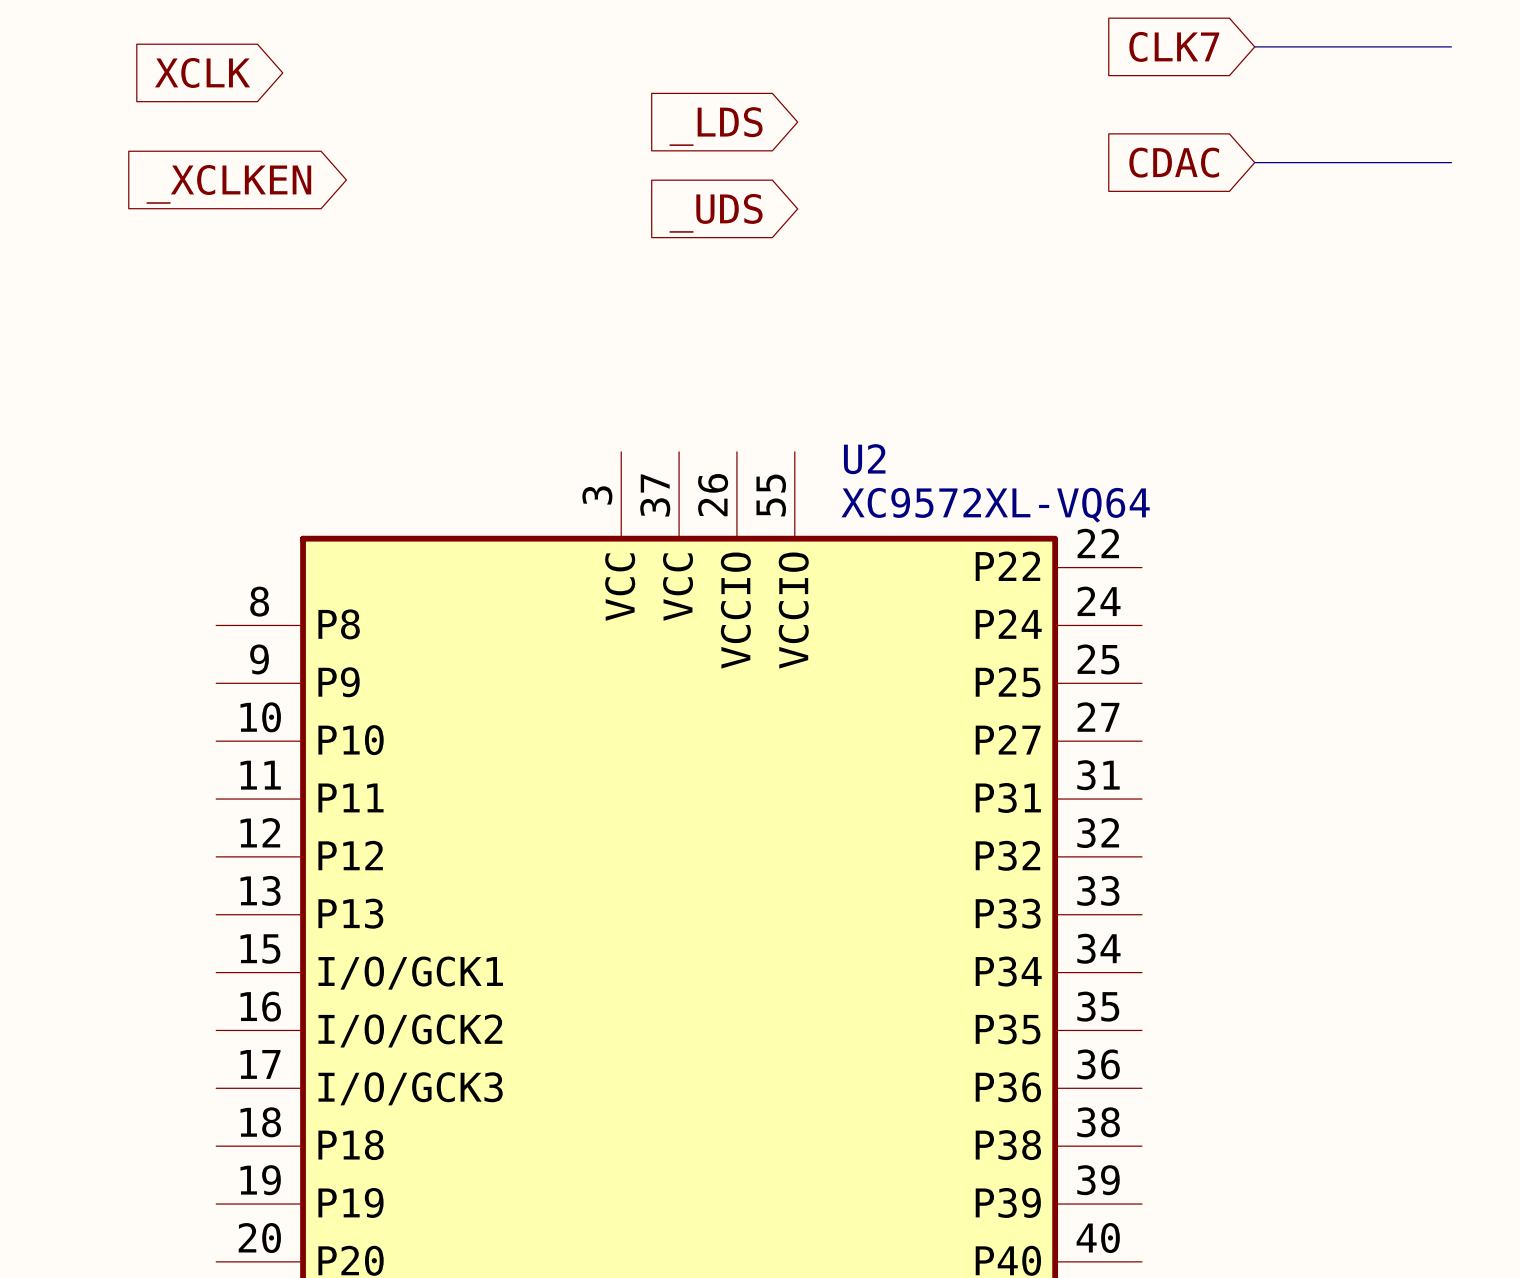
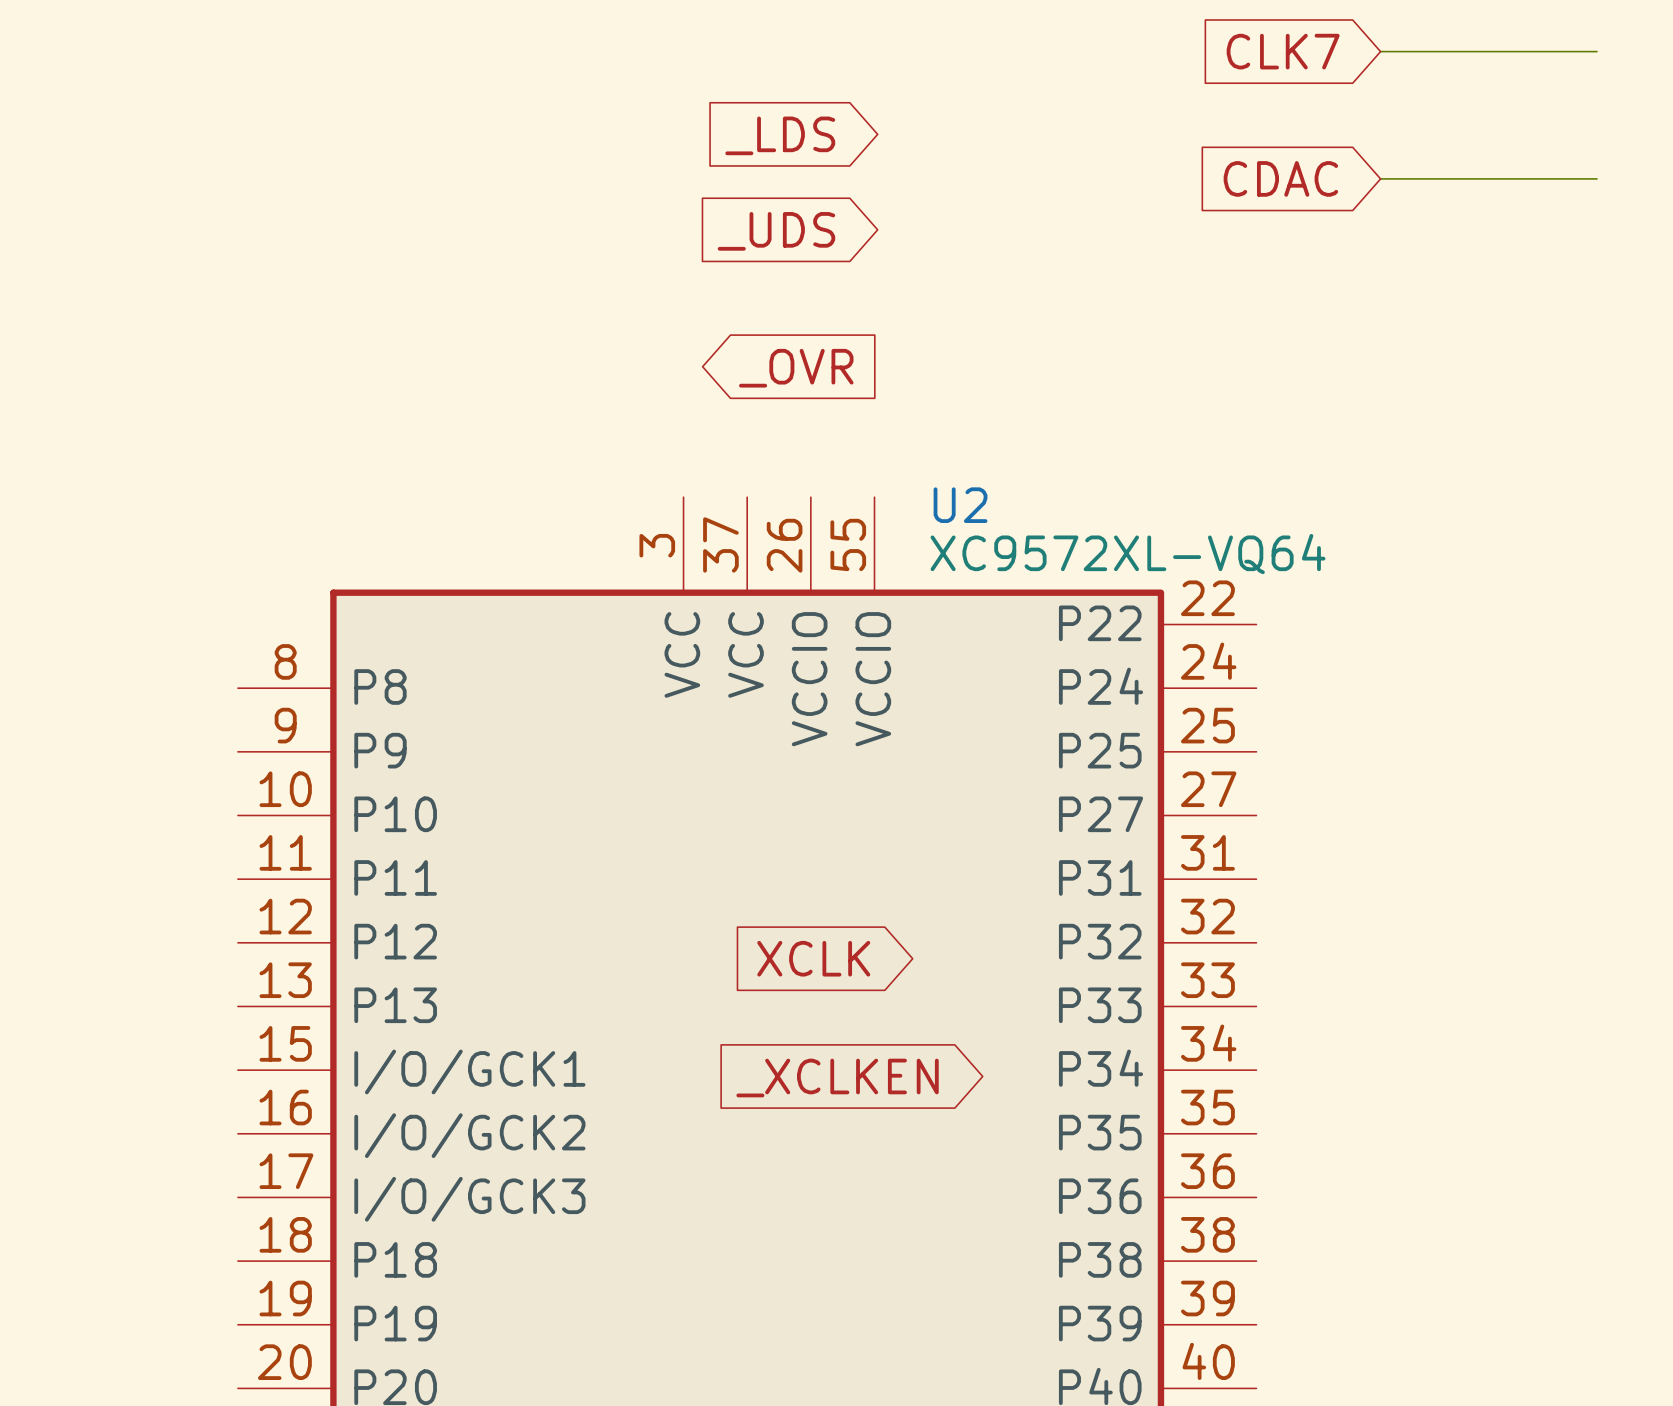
global label: XCLK (202, 72) -> none
global label: _XCLKEN (228, 184) -> none
global label: none -> _OVR (796, 368)
global label: none -> XCLK (813, 958)
global label: none -> _XCLKEN (837, 1078)

